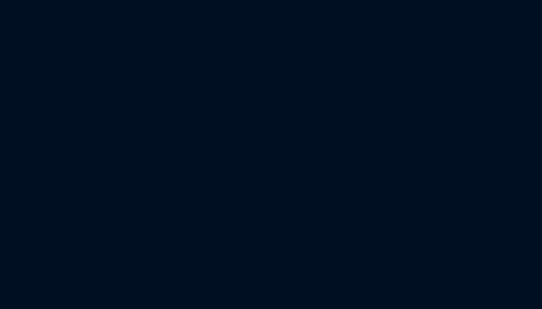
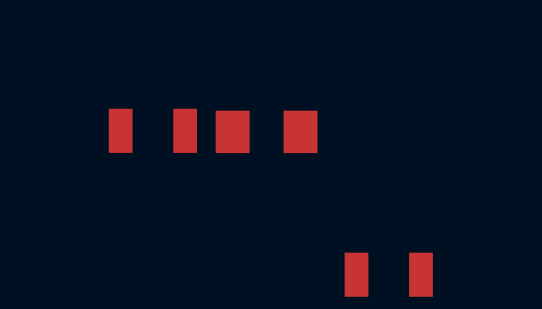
part: none -> (152, 130)
part: none -> (266, 131)
part: none -> (388, 274)

